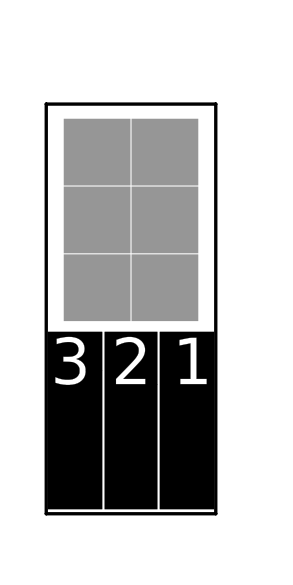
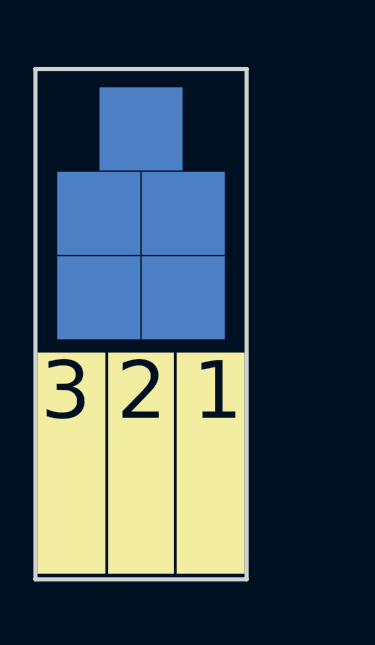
part: (97, 152) -> none
part: none -> (141, 128)
part: (164, 152) -> none

